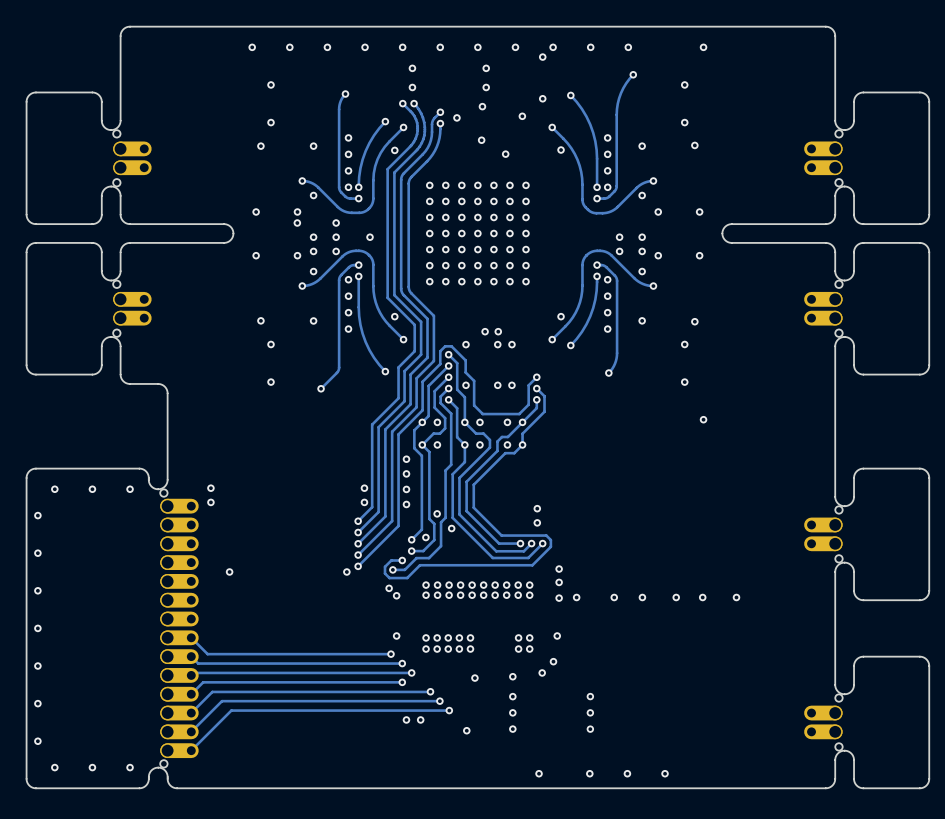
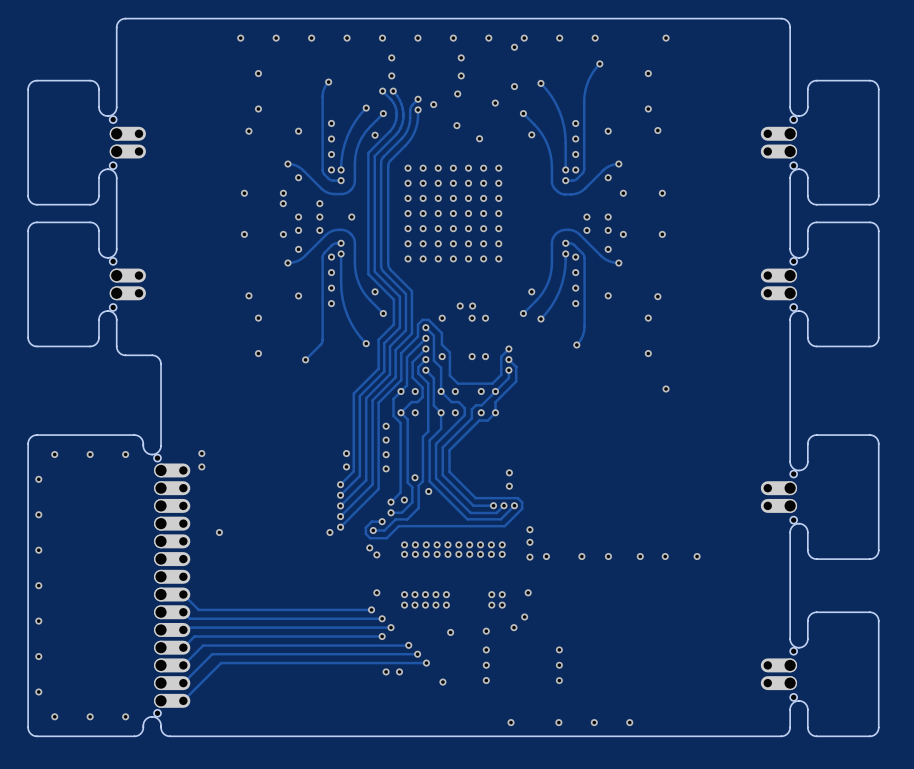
board edge: (120, 214) (122, 220) (128, 224) (225, 224) (230, 226) (233, 233) (231, 239) (225, 242) (128, 242) (123, 245) (120, 252) -> (116, 195) (116, 231)
board edge: (835, 214) (832, 221) (826, 224) (730, 224) (724, 227) (722, 233) (725, 240) (730, 242) (826, 242) (832, 245) (835, 252) -> (790, 195) (790, 231)

